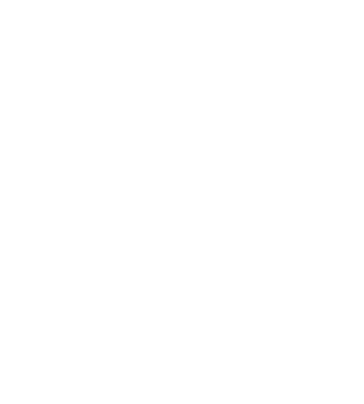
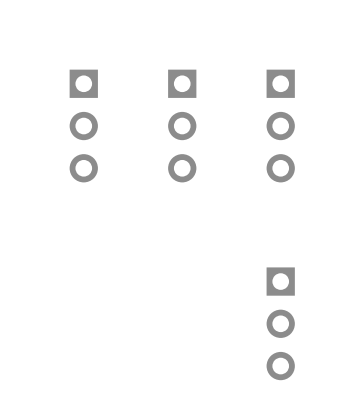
part: none -> (83, 126)
part: none -> (182, 126)
part: none -> (280, 126)
part: none -> (280, 323)

